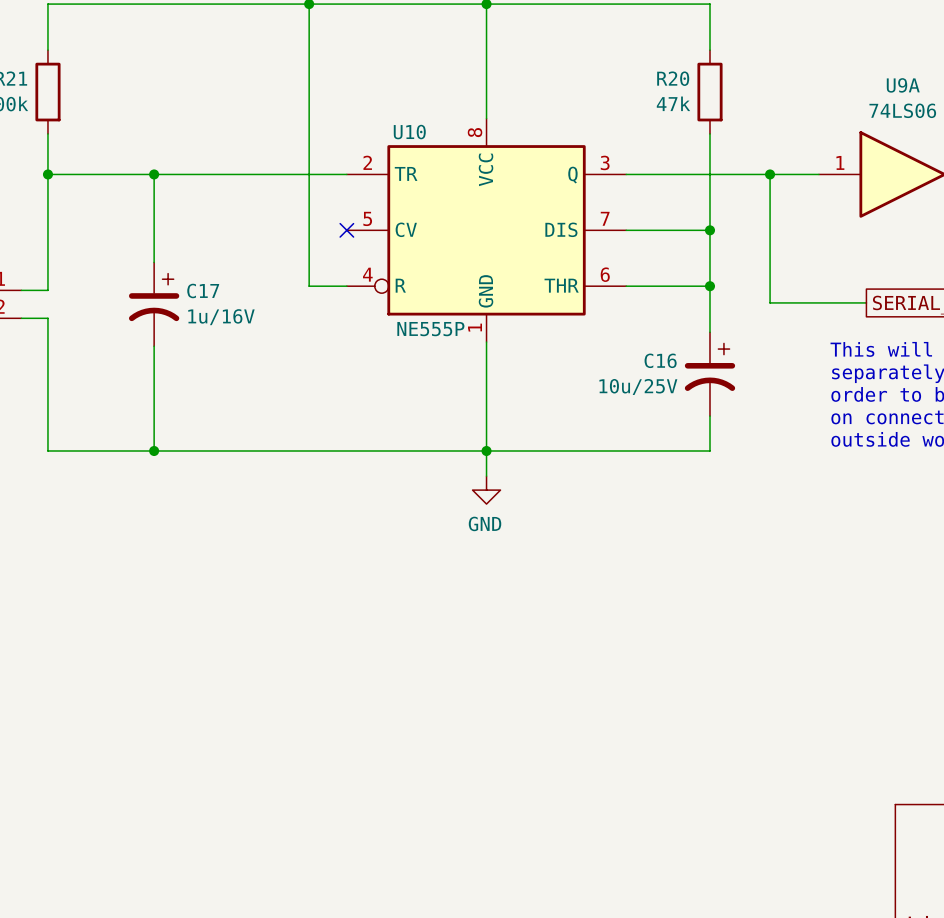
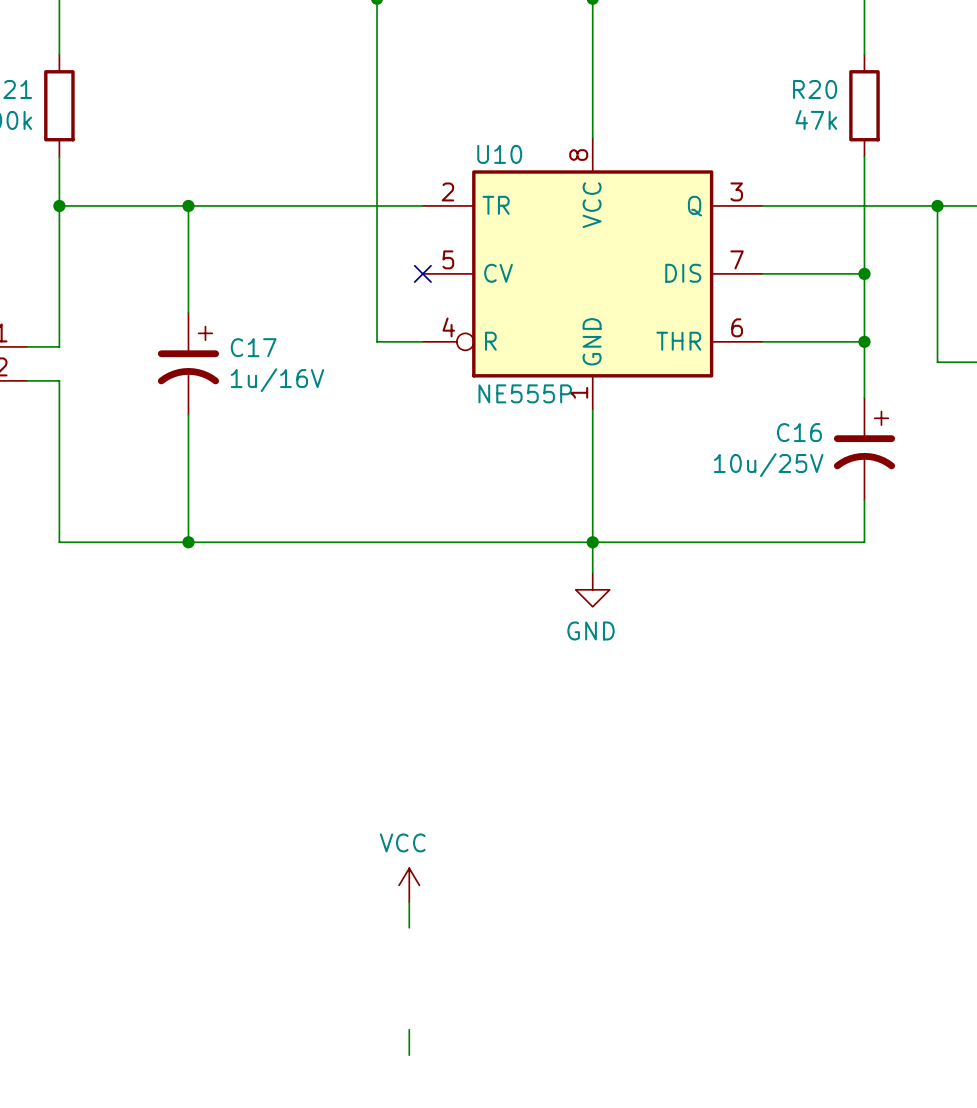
power symbol: none -> VCC (409, 885)
wire: none -> (409, 902) (409, 927)
wire: none -> (409, 1029) (409, 1055)

